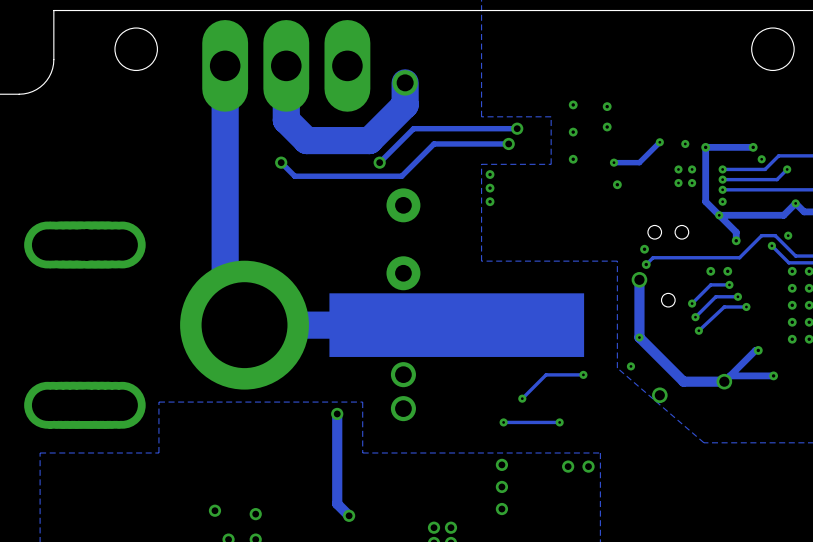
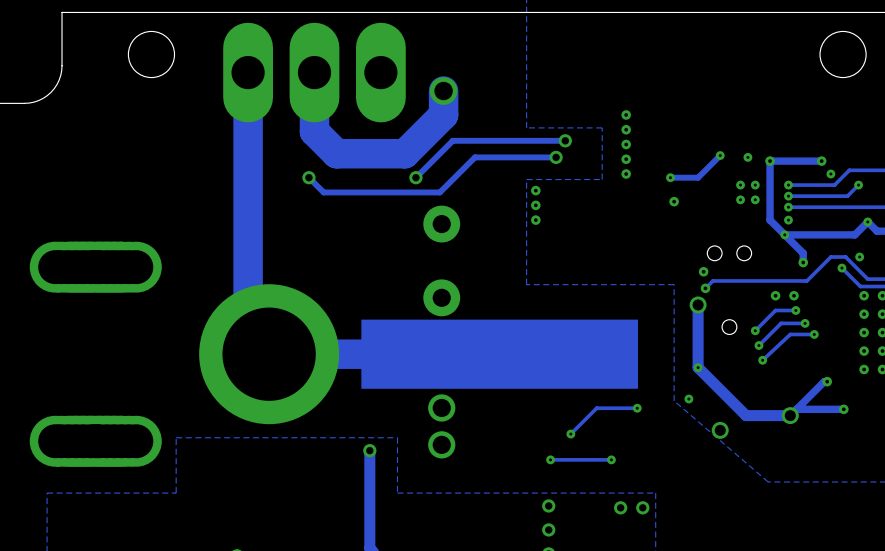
via: (607, 106) -> none
via: none -> (626, 129)
via: (607, 126) -> none
via: none -> (626, 159)

